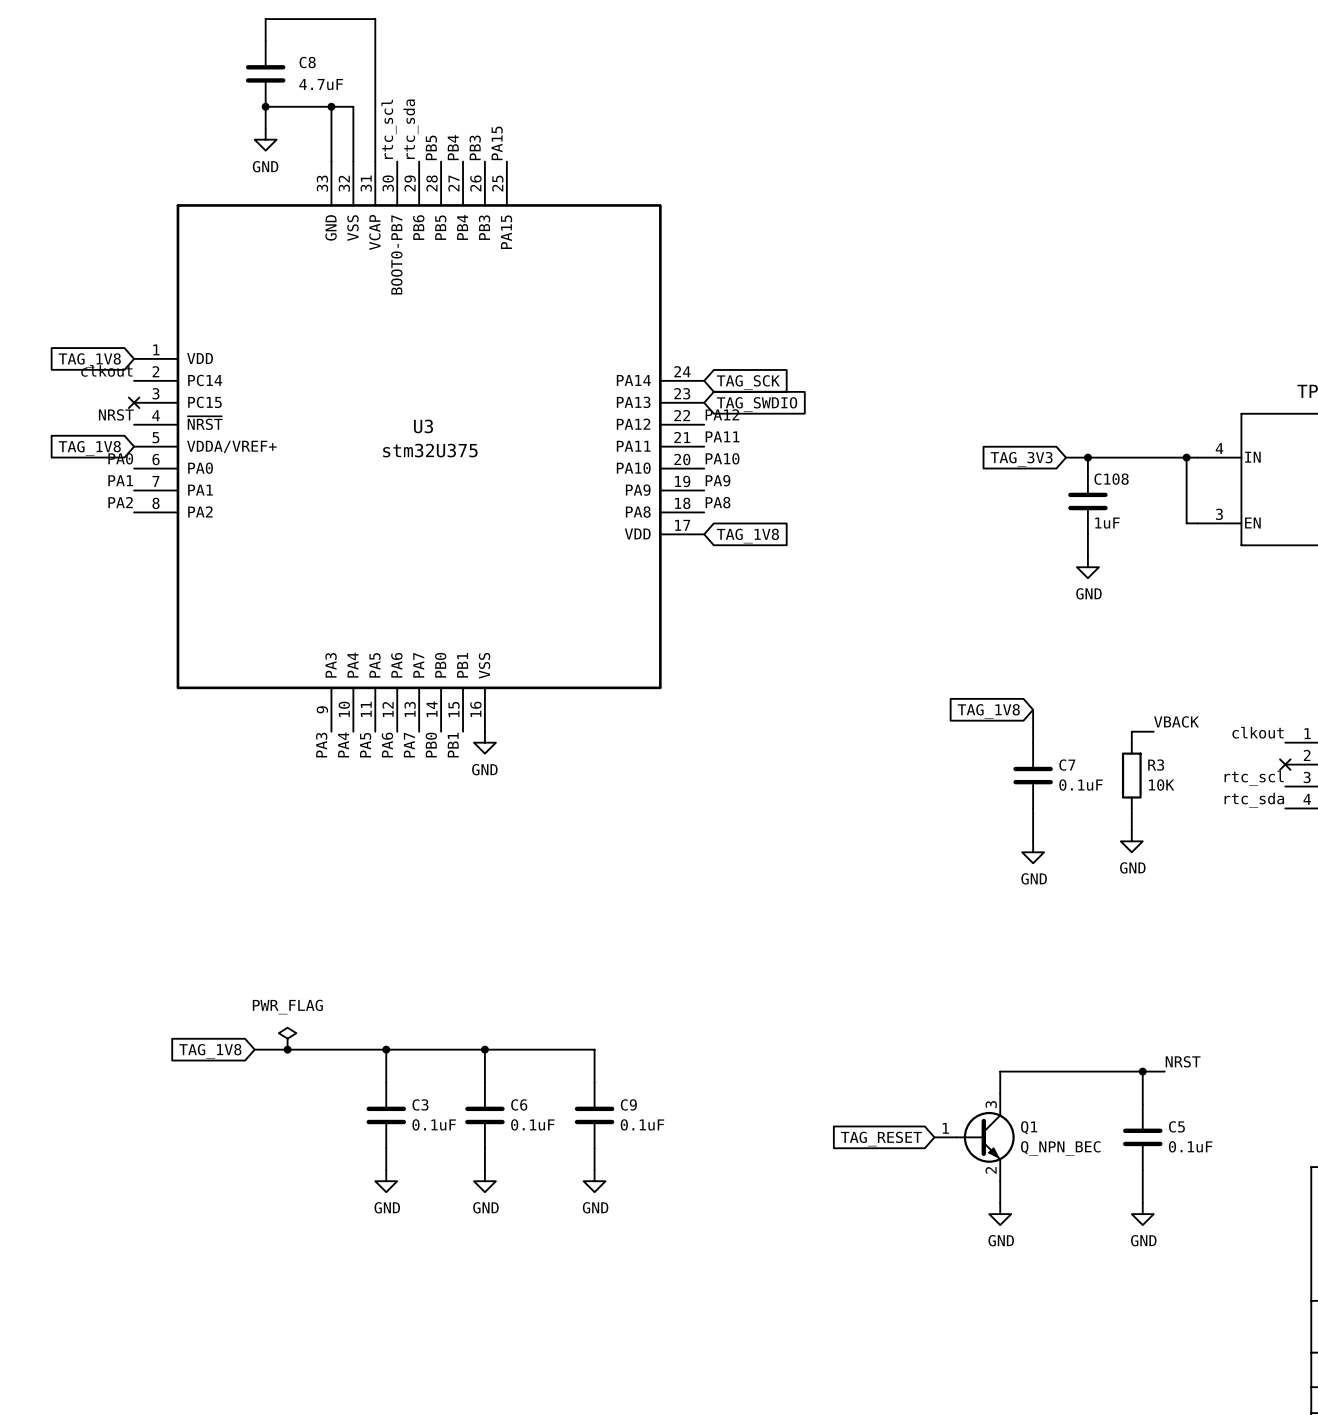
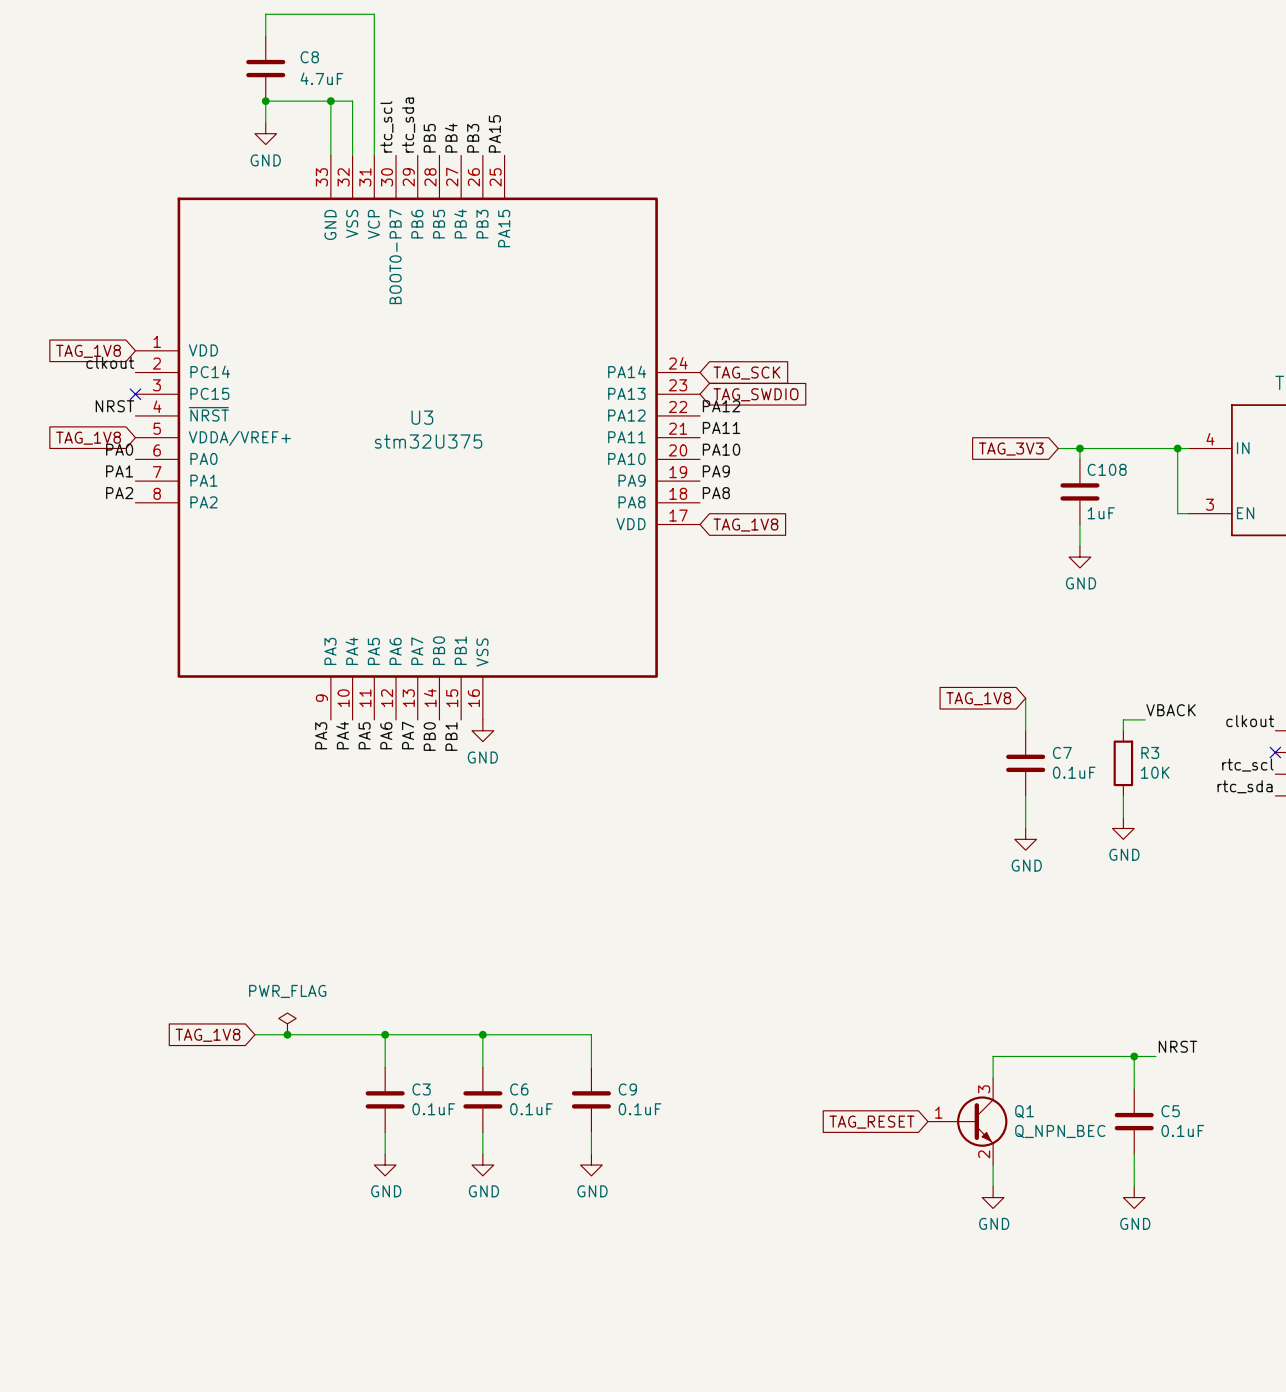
U3 pin name: VCAP (374, 232) -> VCP (373, 224)

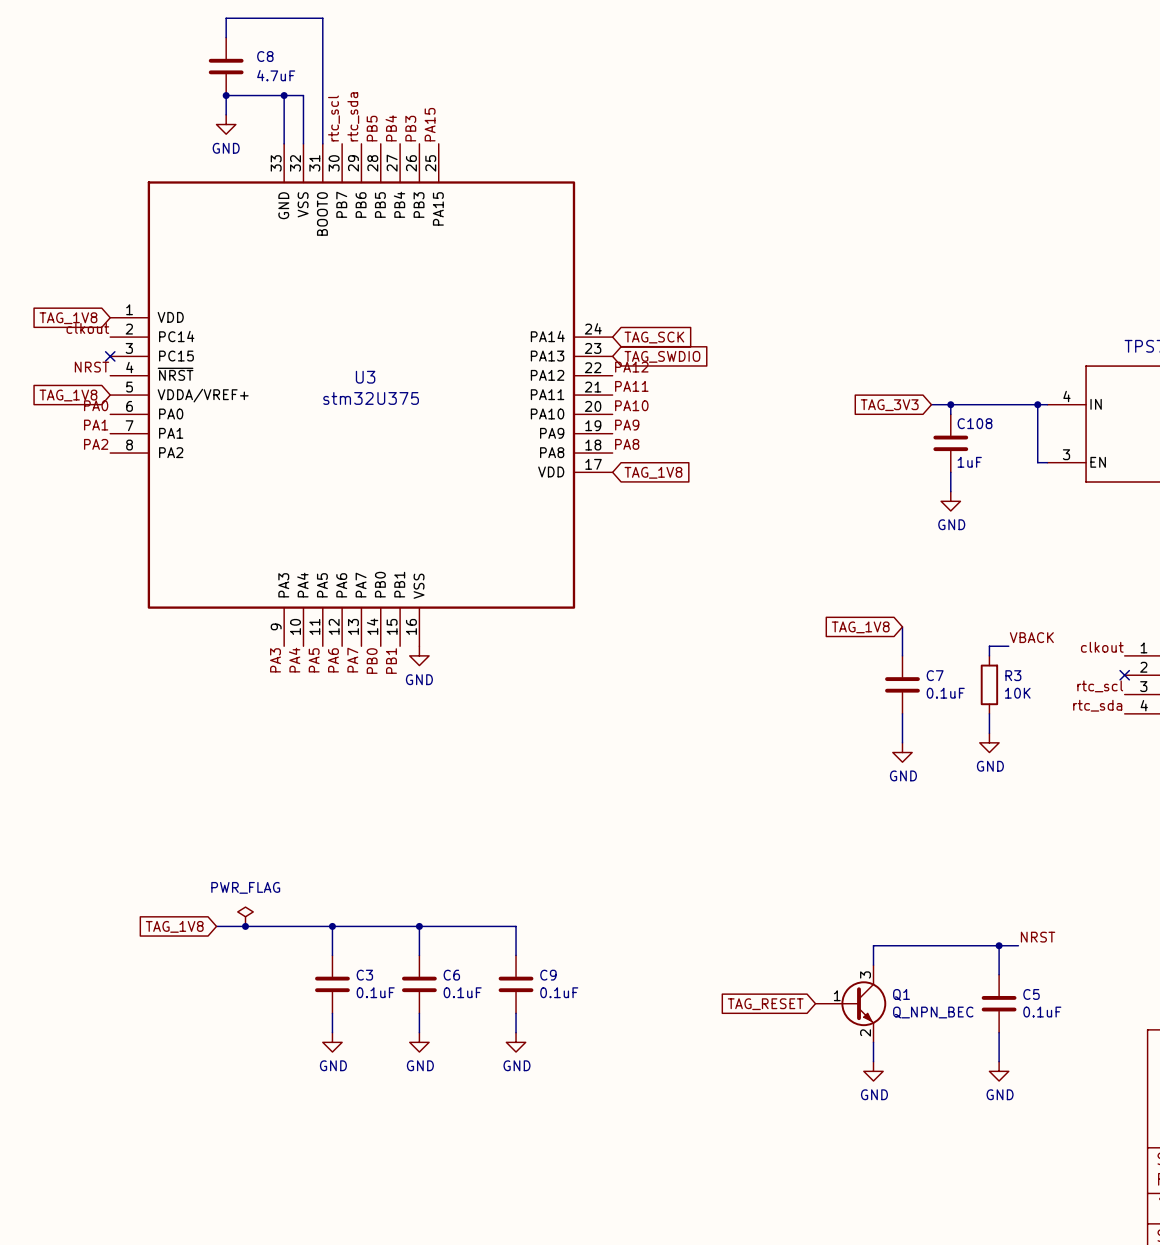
U3 pin name: VCP (373, 224) -> BOOT0 (322, 213)
U3 pin name: BOOT0-PB7 (395, 256) -> PB7 (341, 204)
Q1 symbol: [927, 1078, 1008, 1166] -> [815, 965, 887, 1043]

